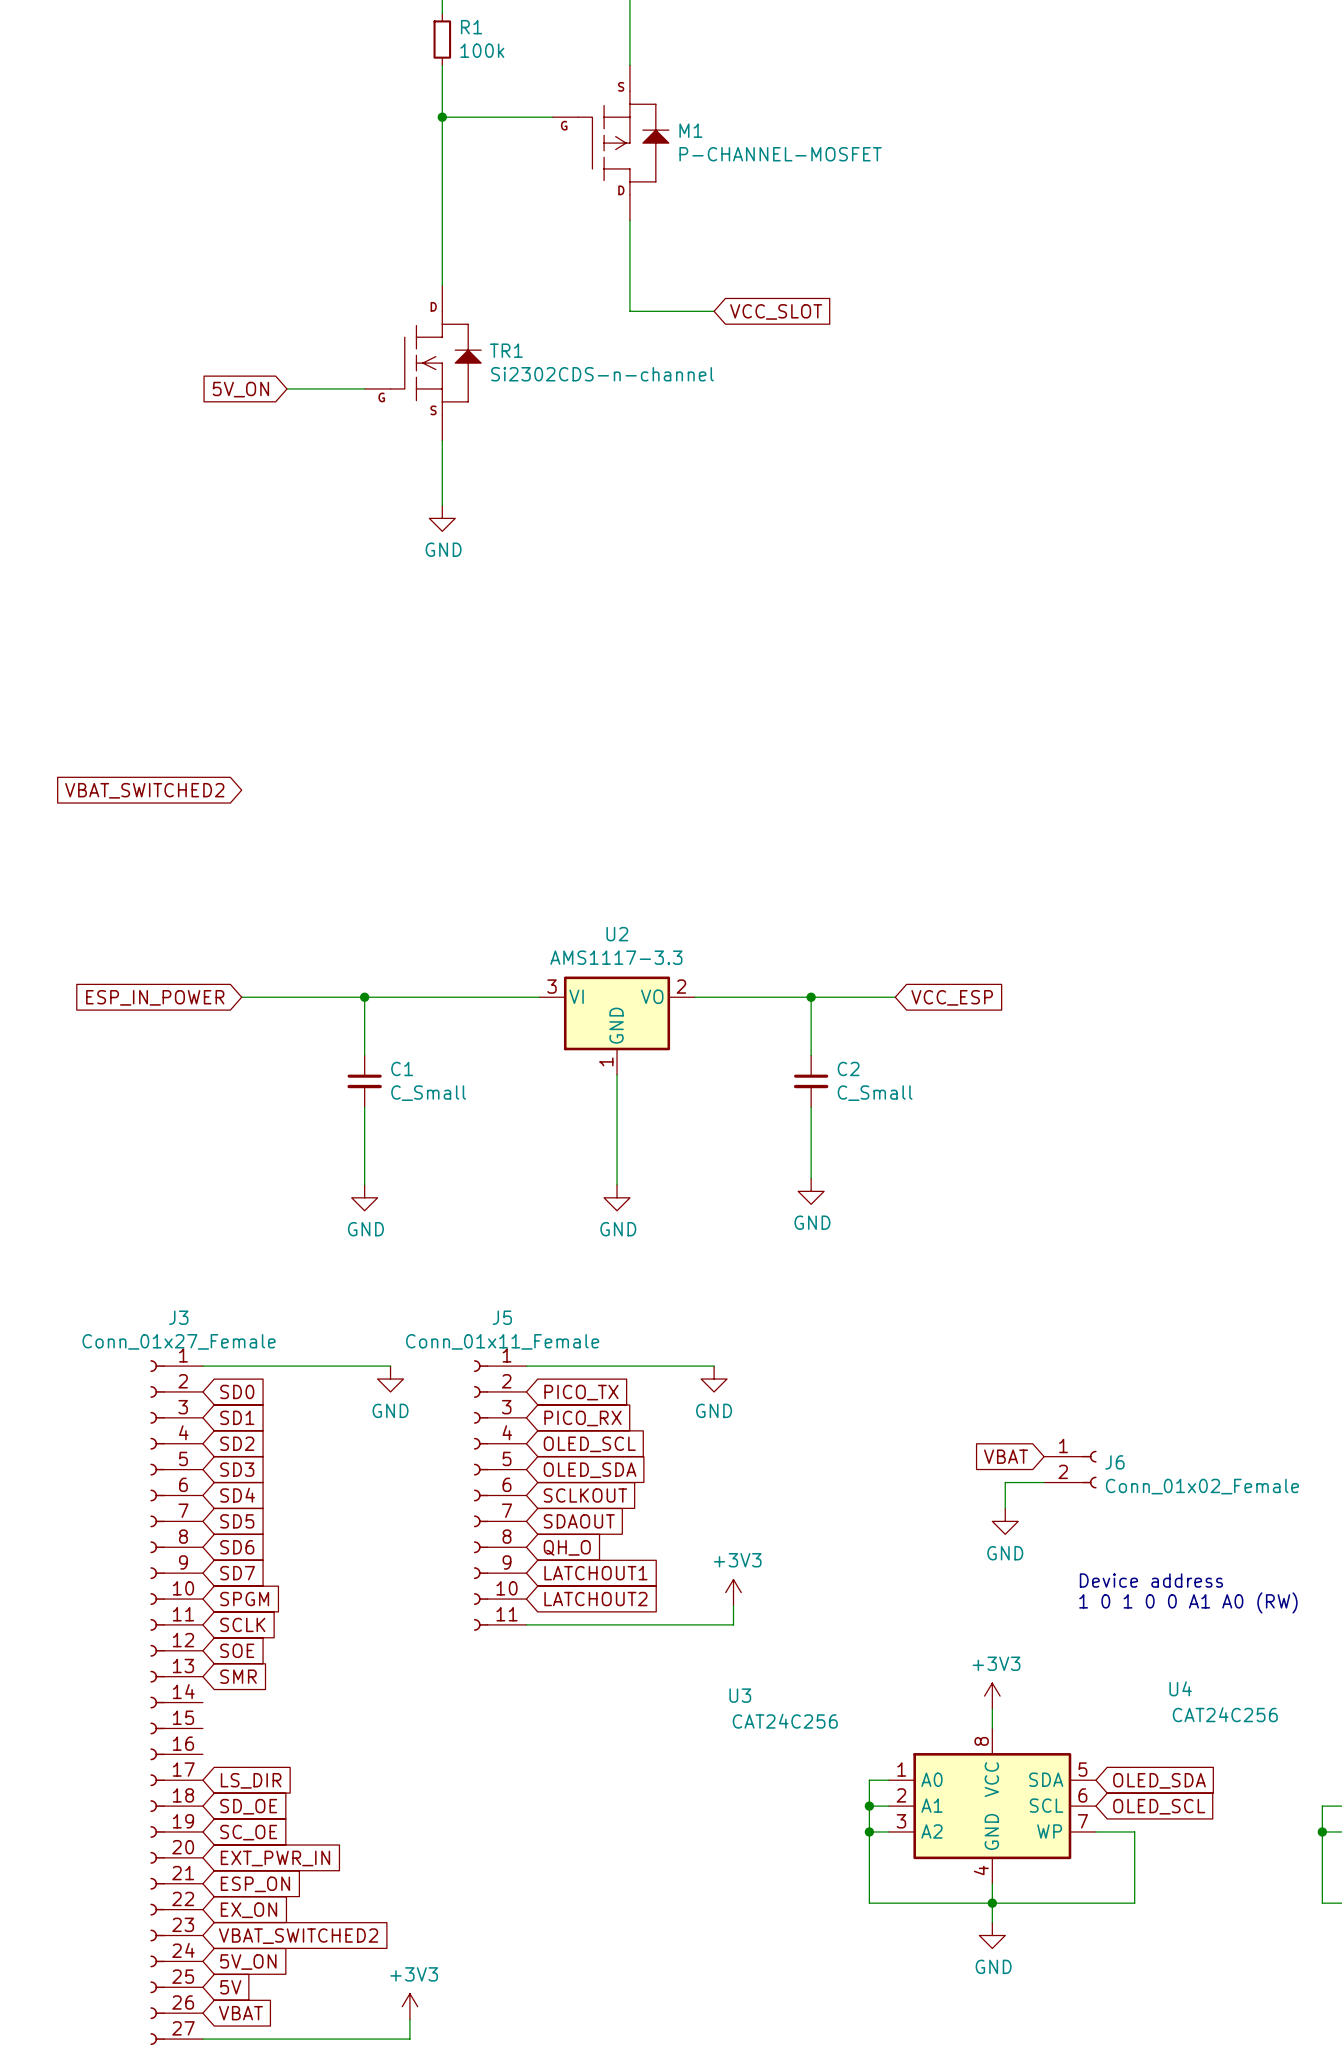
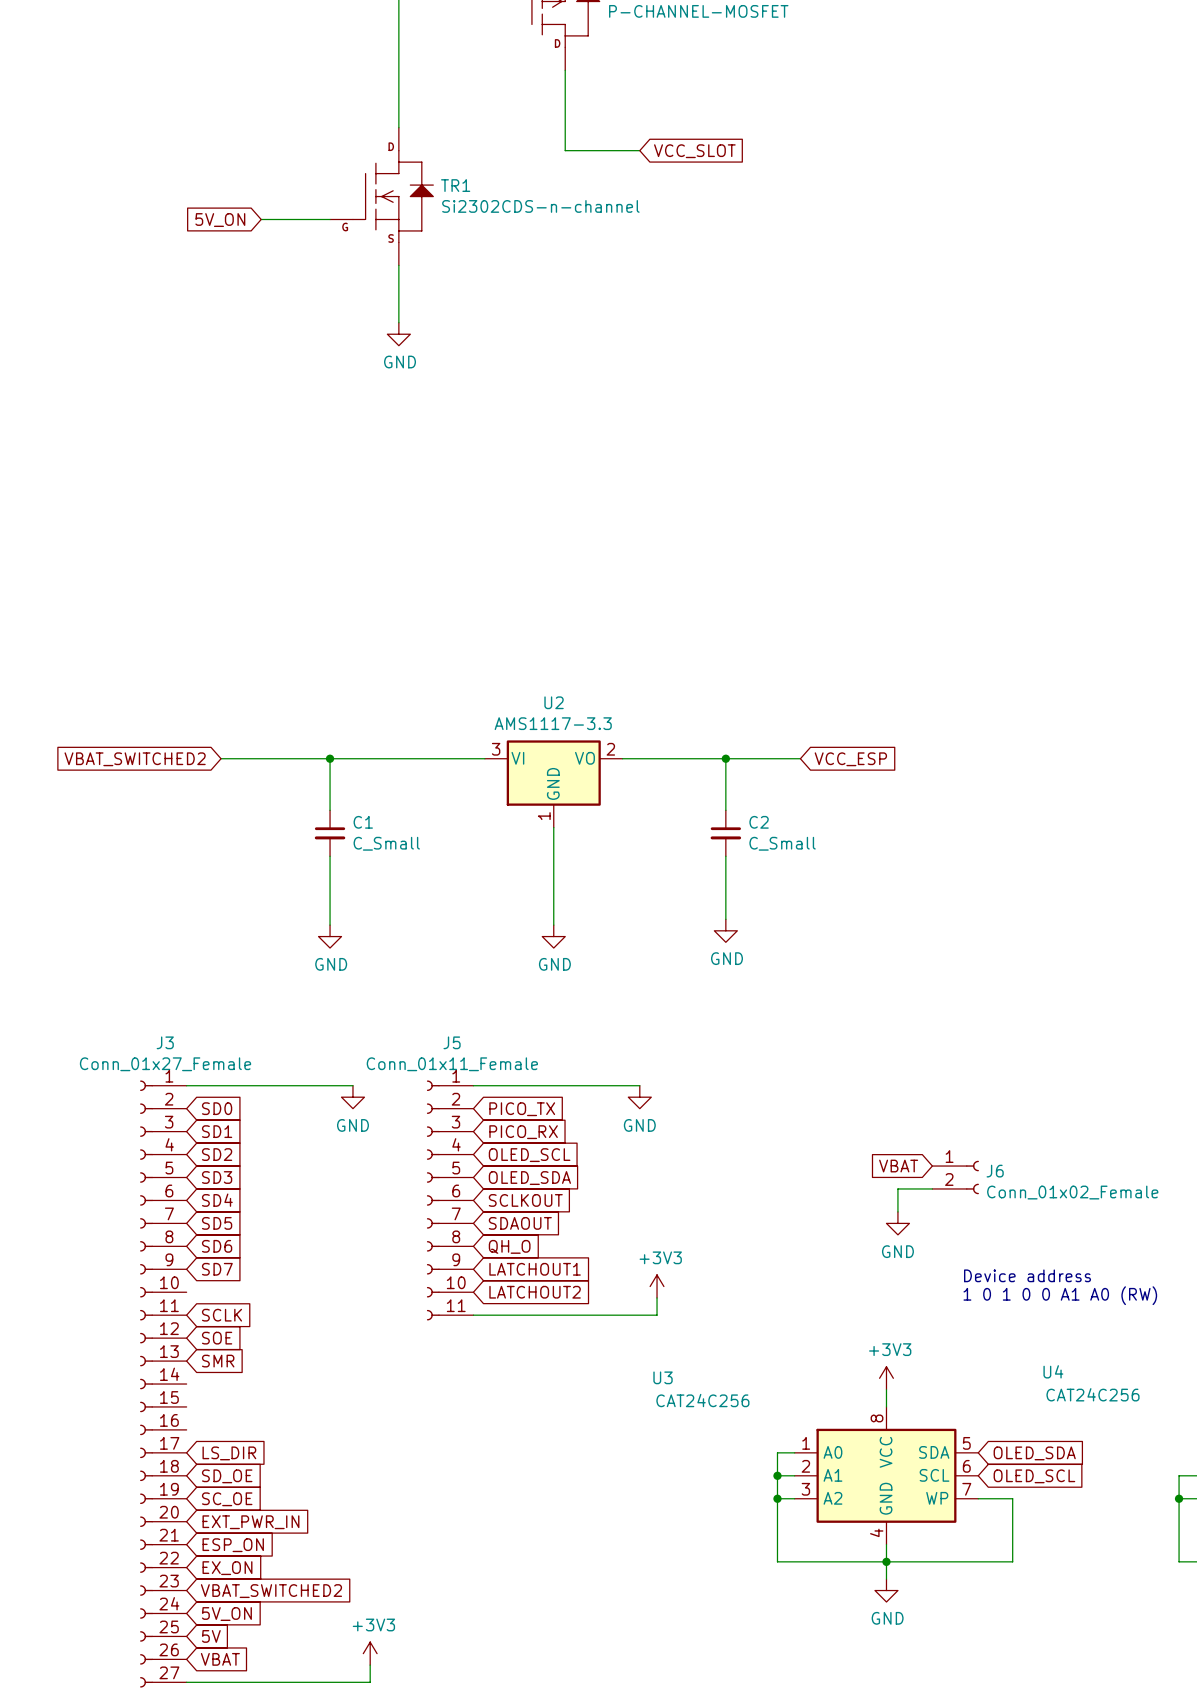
global label: VBAT_SWITCHED2 (144, 790) -> none
global label: ESP_IN_POWER (155, 997) -> VBAT_SWITCHED2 (135, 759)
global label: SPGM (244, 1599) -> none

